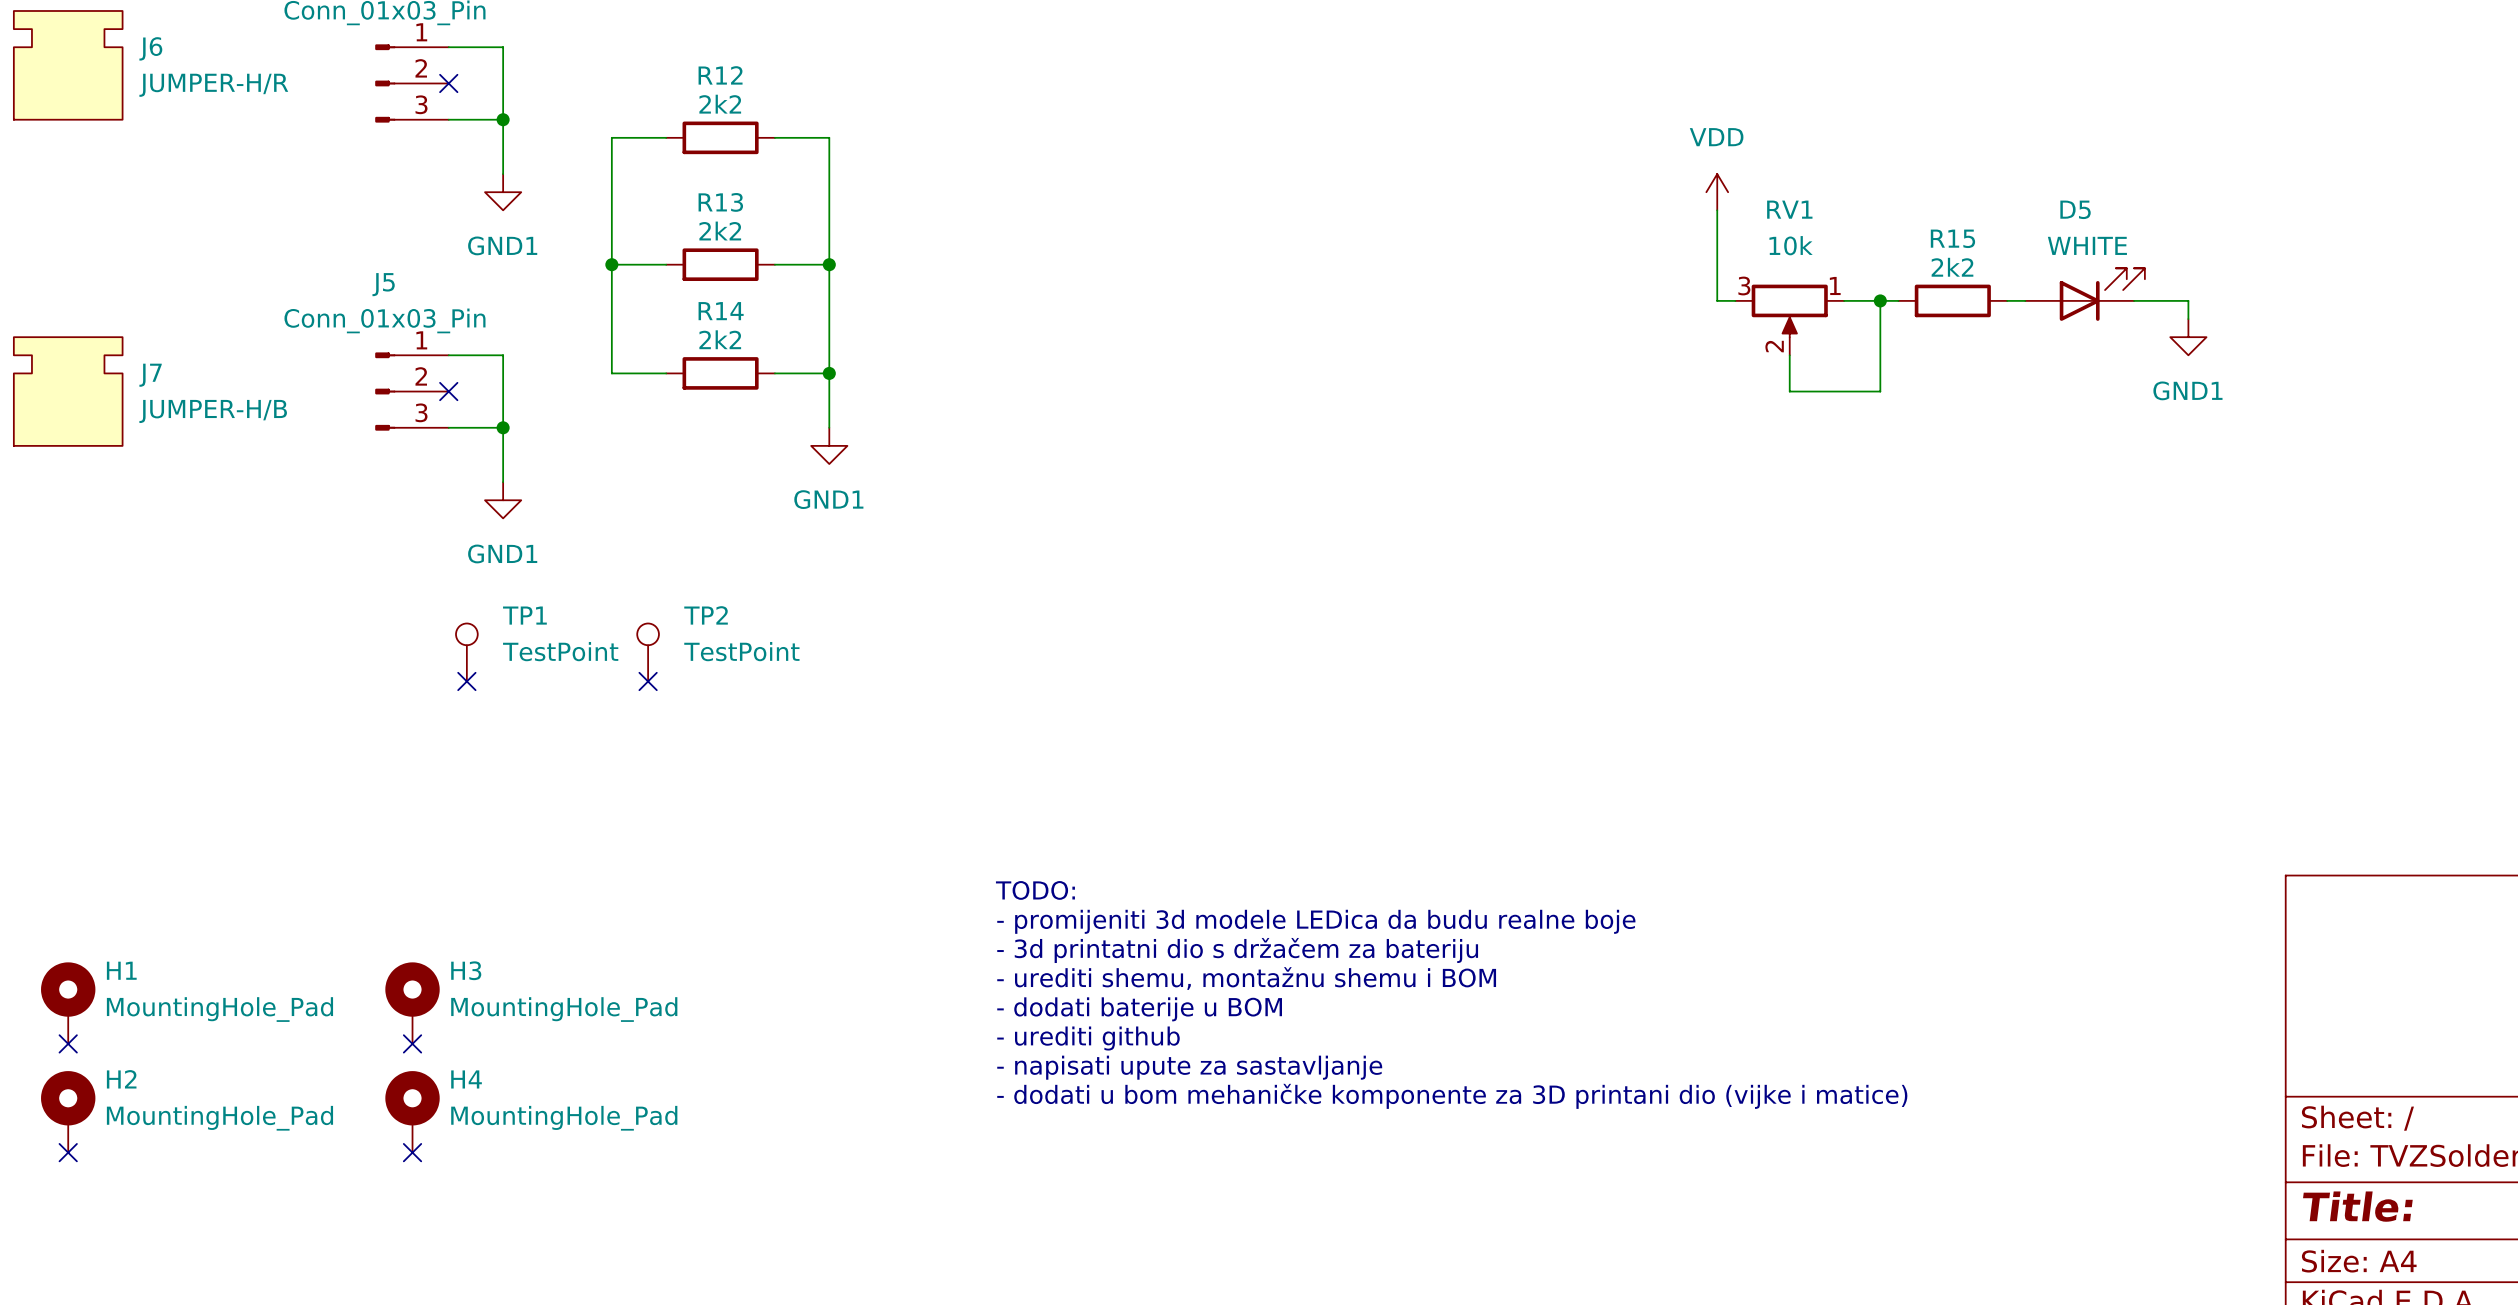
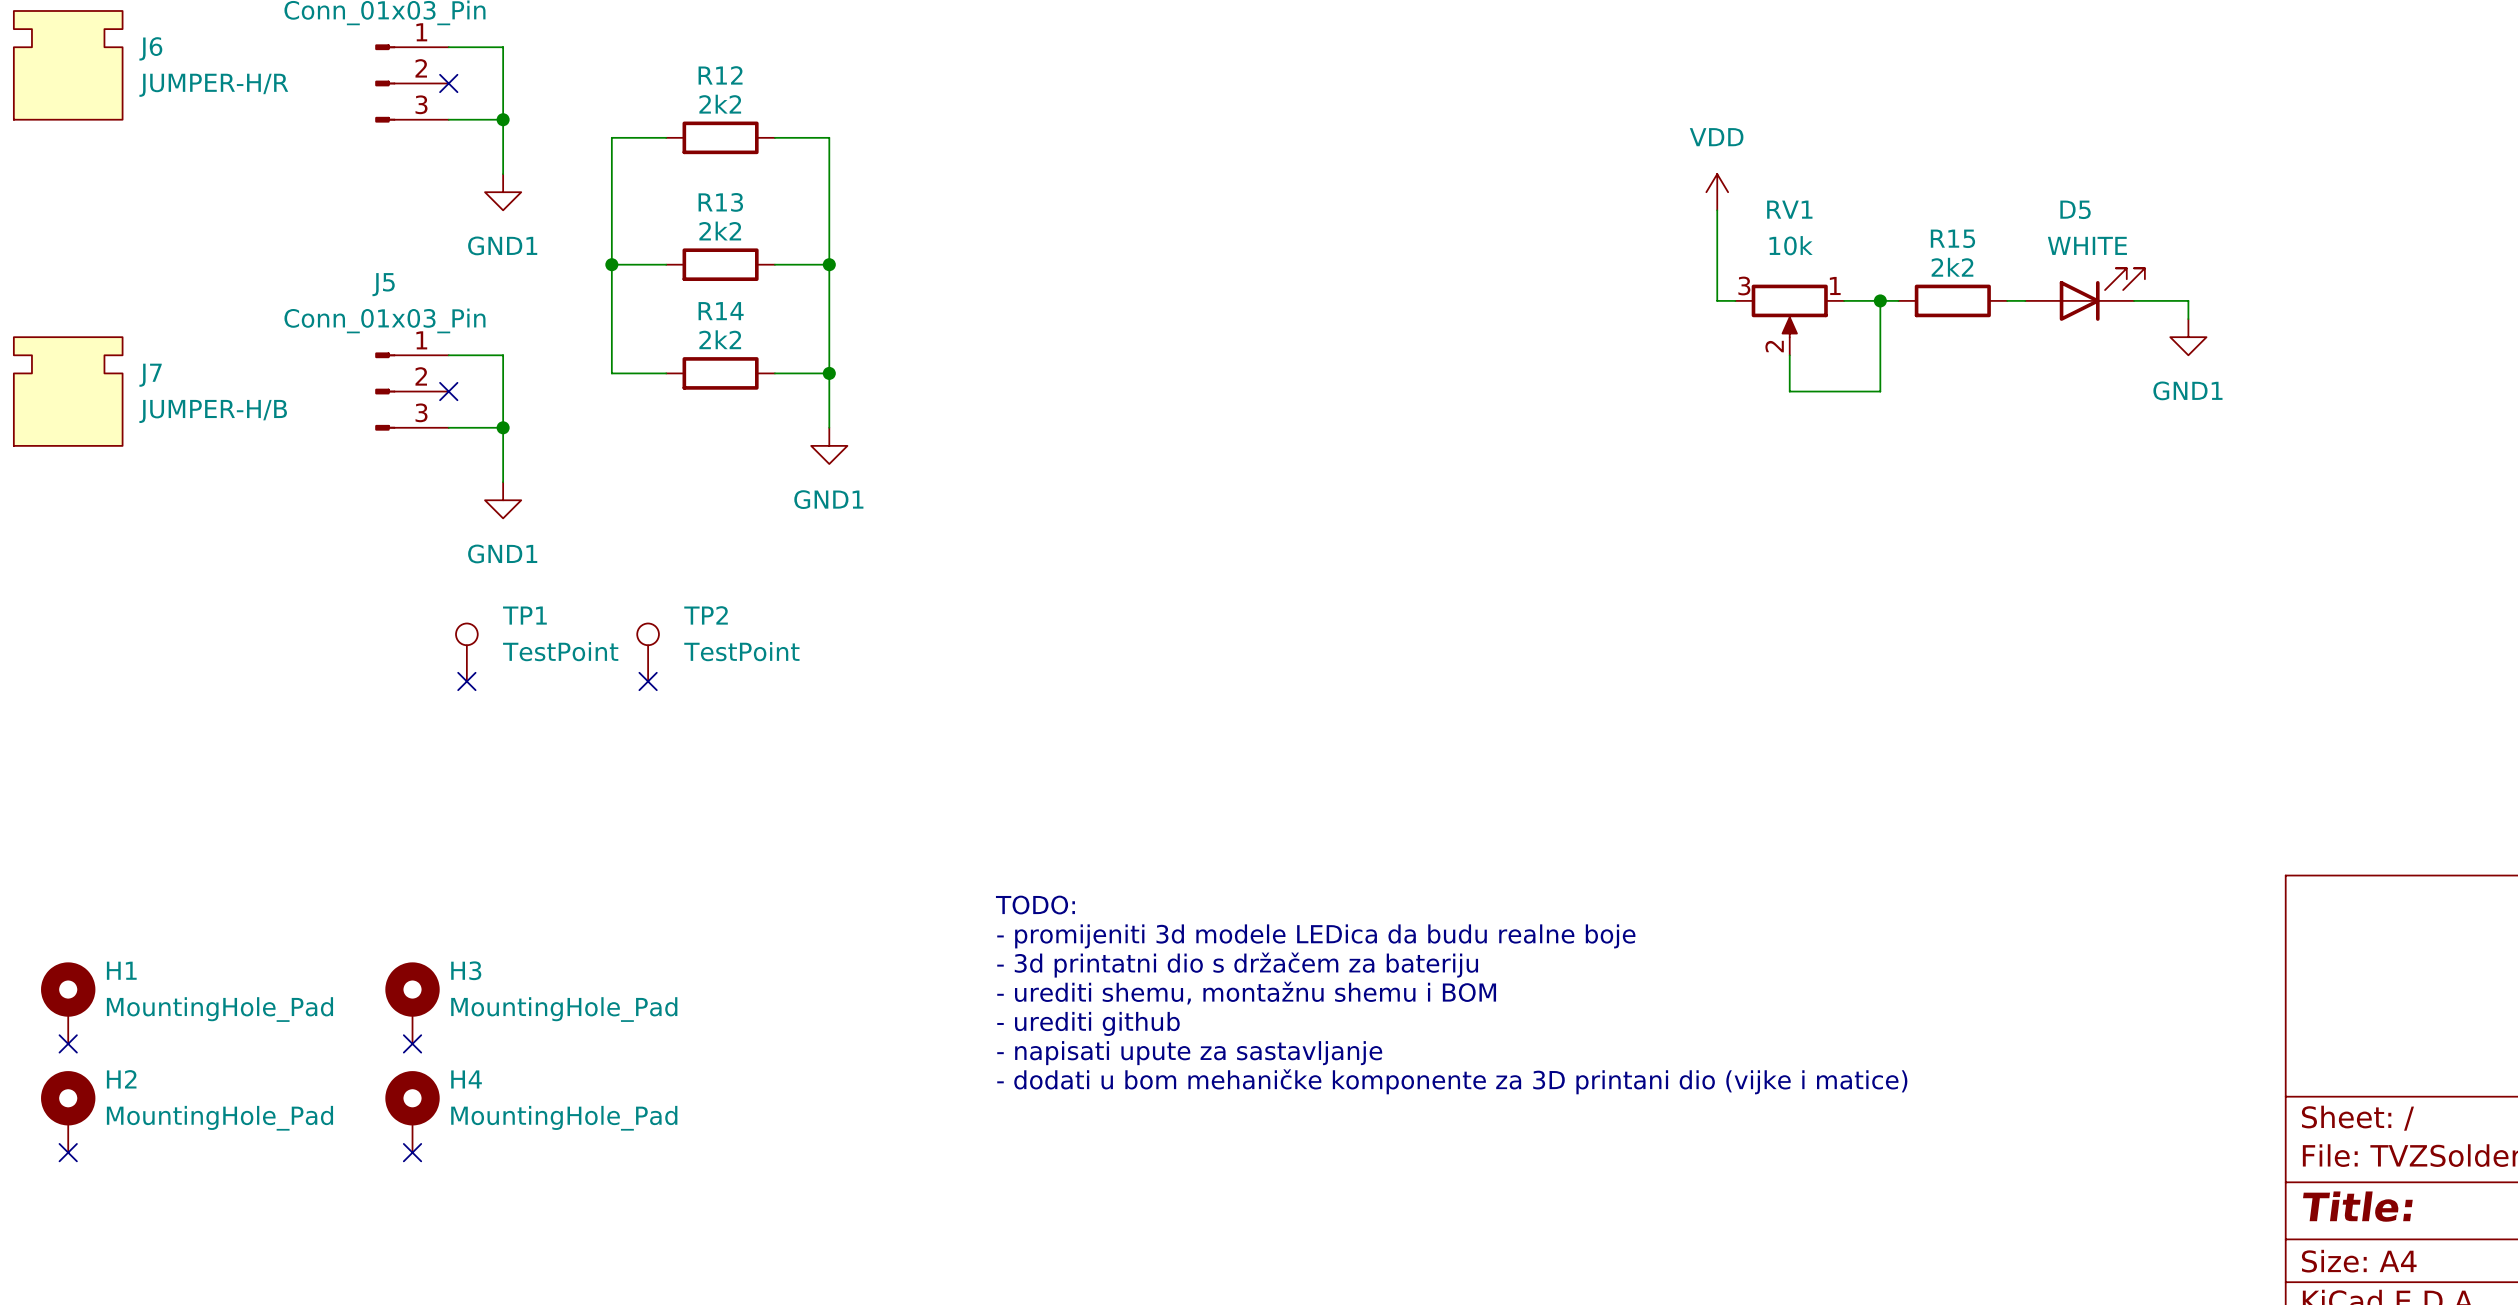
text position: TODO: (1035, 890) -> TODO: (1035, 905)
text position: - promijeniti 3d modele LEDica da budu realne boje (1316, 921) -> - promijeniti 3d modele LEDica da budu realne boje (1316, 936)
text position: - 3d printatni dio s držačem za bateriju (1237, 950) -> - 3d printatni dio s držačem za bateriju (1237, 965)
text position: - urediti shemu, montažnu shemu i BOM (1246, 978) -> - urediti shemu, montažnu shemu i BOM (1246, 993)
text: - dodati baterije u BOM (1139, 1009) -> none
text position: - urediti github (1088, 1038) -> - urediti github (1088, 1023)
text position: - napisati upute za sastavljanje (1189, 1067) -> - napisati upute za sastavljanje (1189, 1053)
text position: - dodati u bom mehaničke komponente za 3D printani dio (vijke i matice) (1452, 1096) -> - dodati u bom mehaničke komponente za 3D printani dio (vijke i matice) (1452, 1081)

